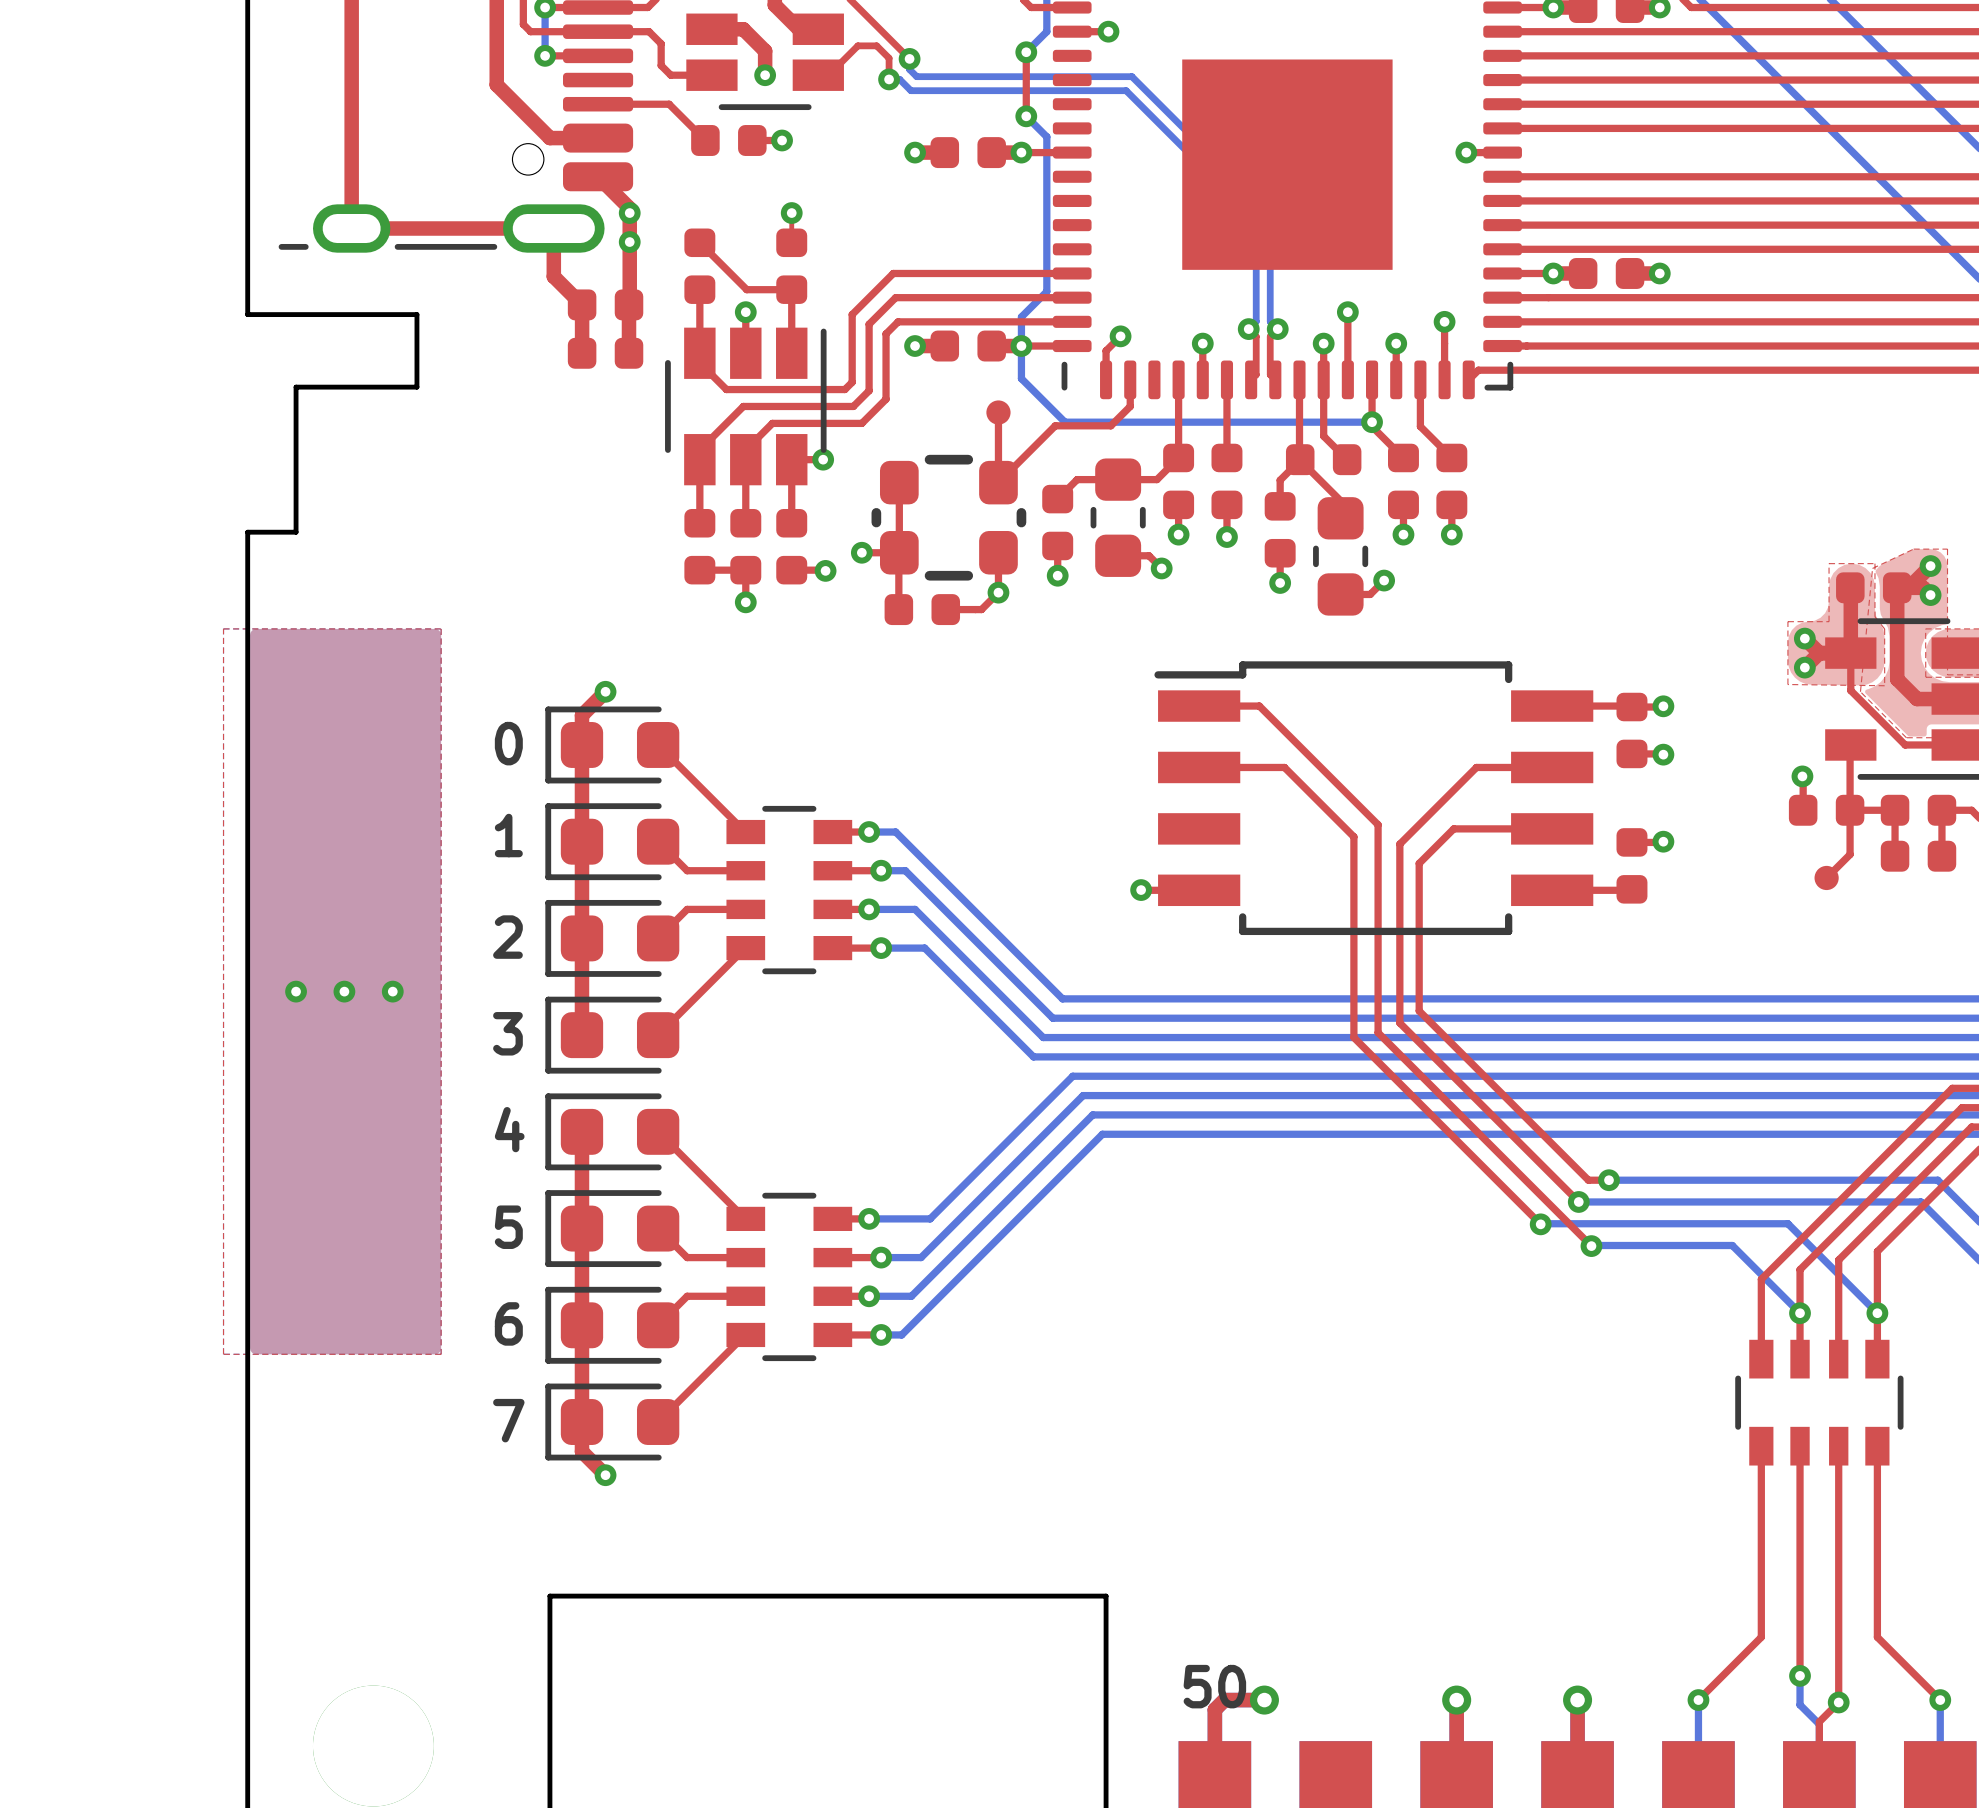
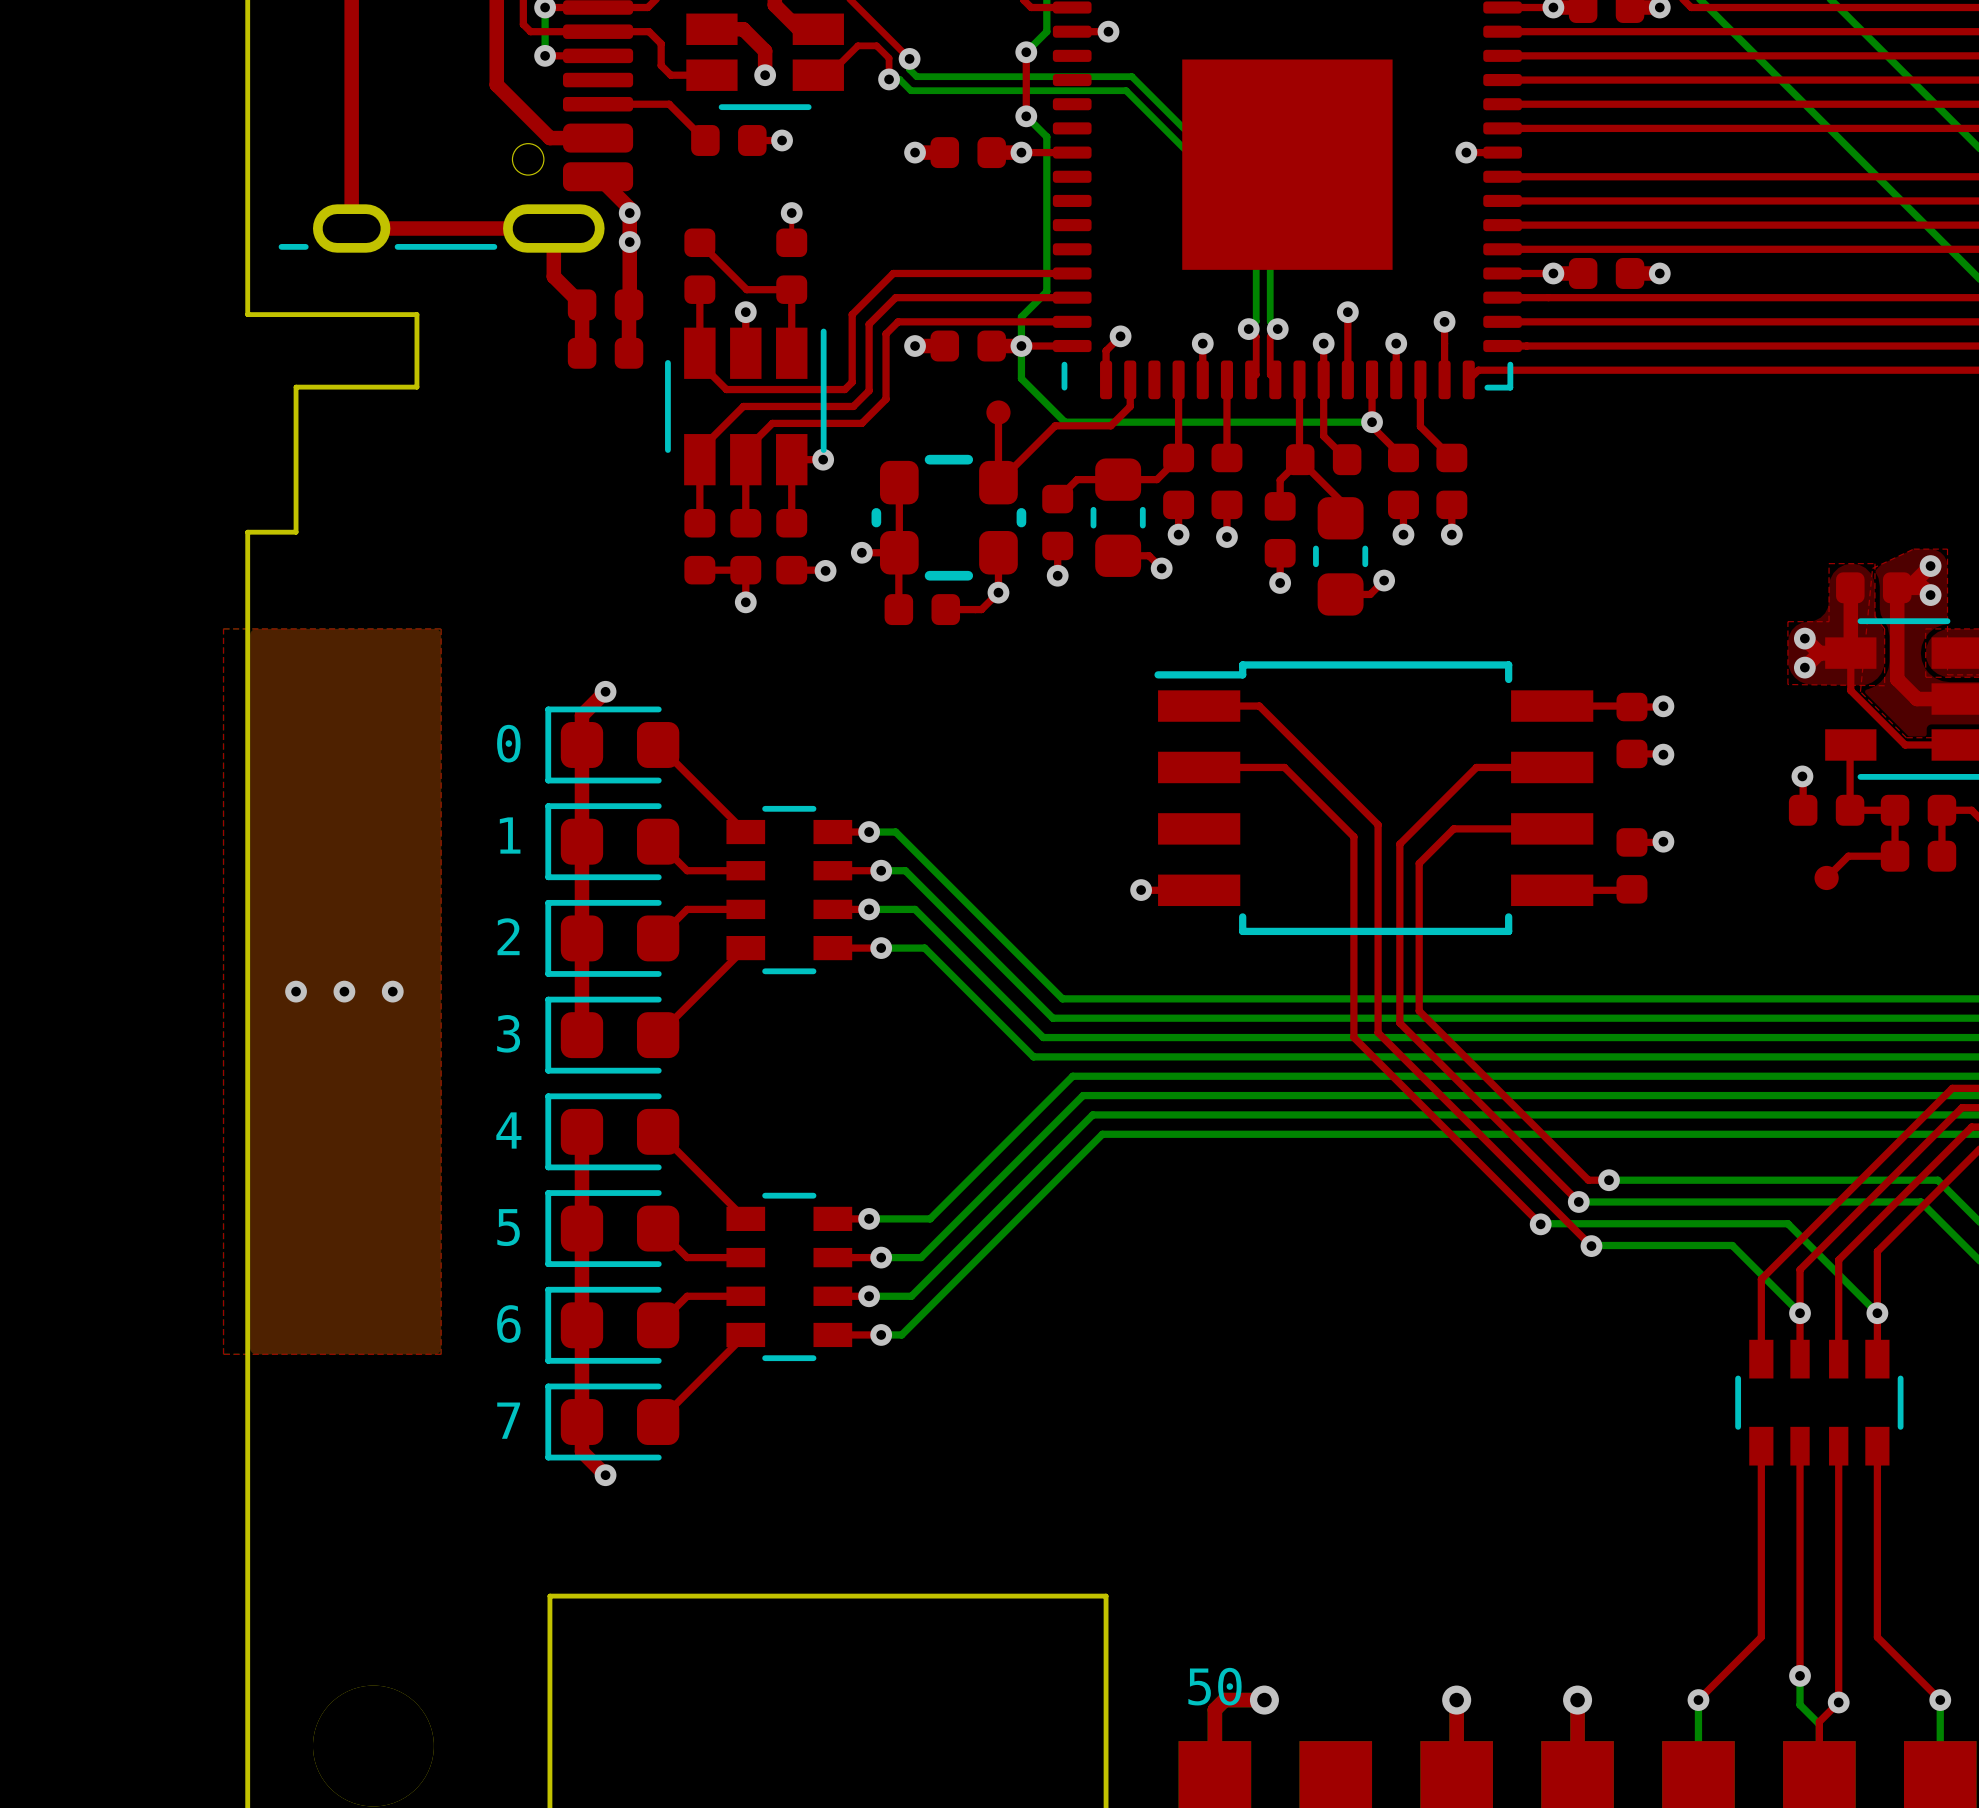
top track: (1850, 810) (1850, 854) (1848, 856) -> (1895, 856) (1848, 856)

